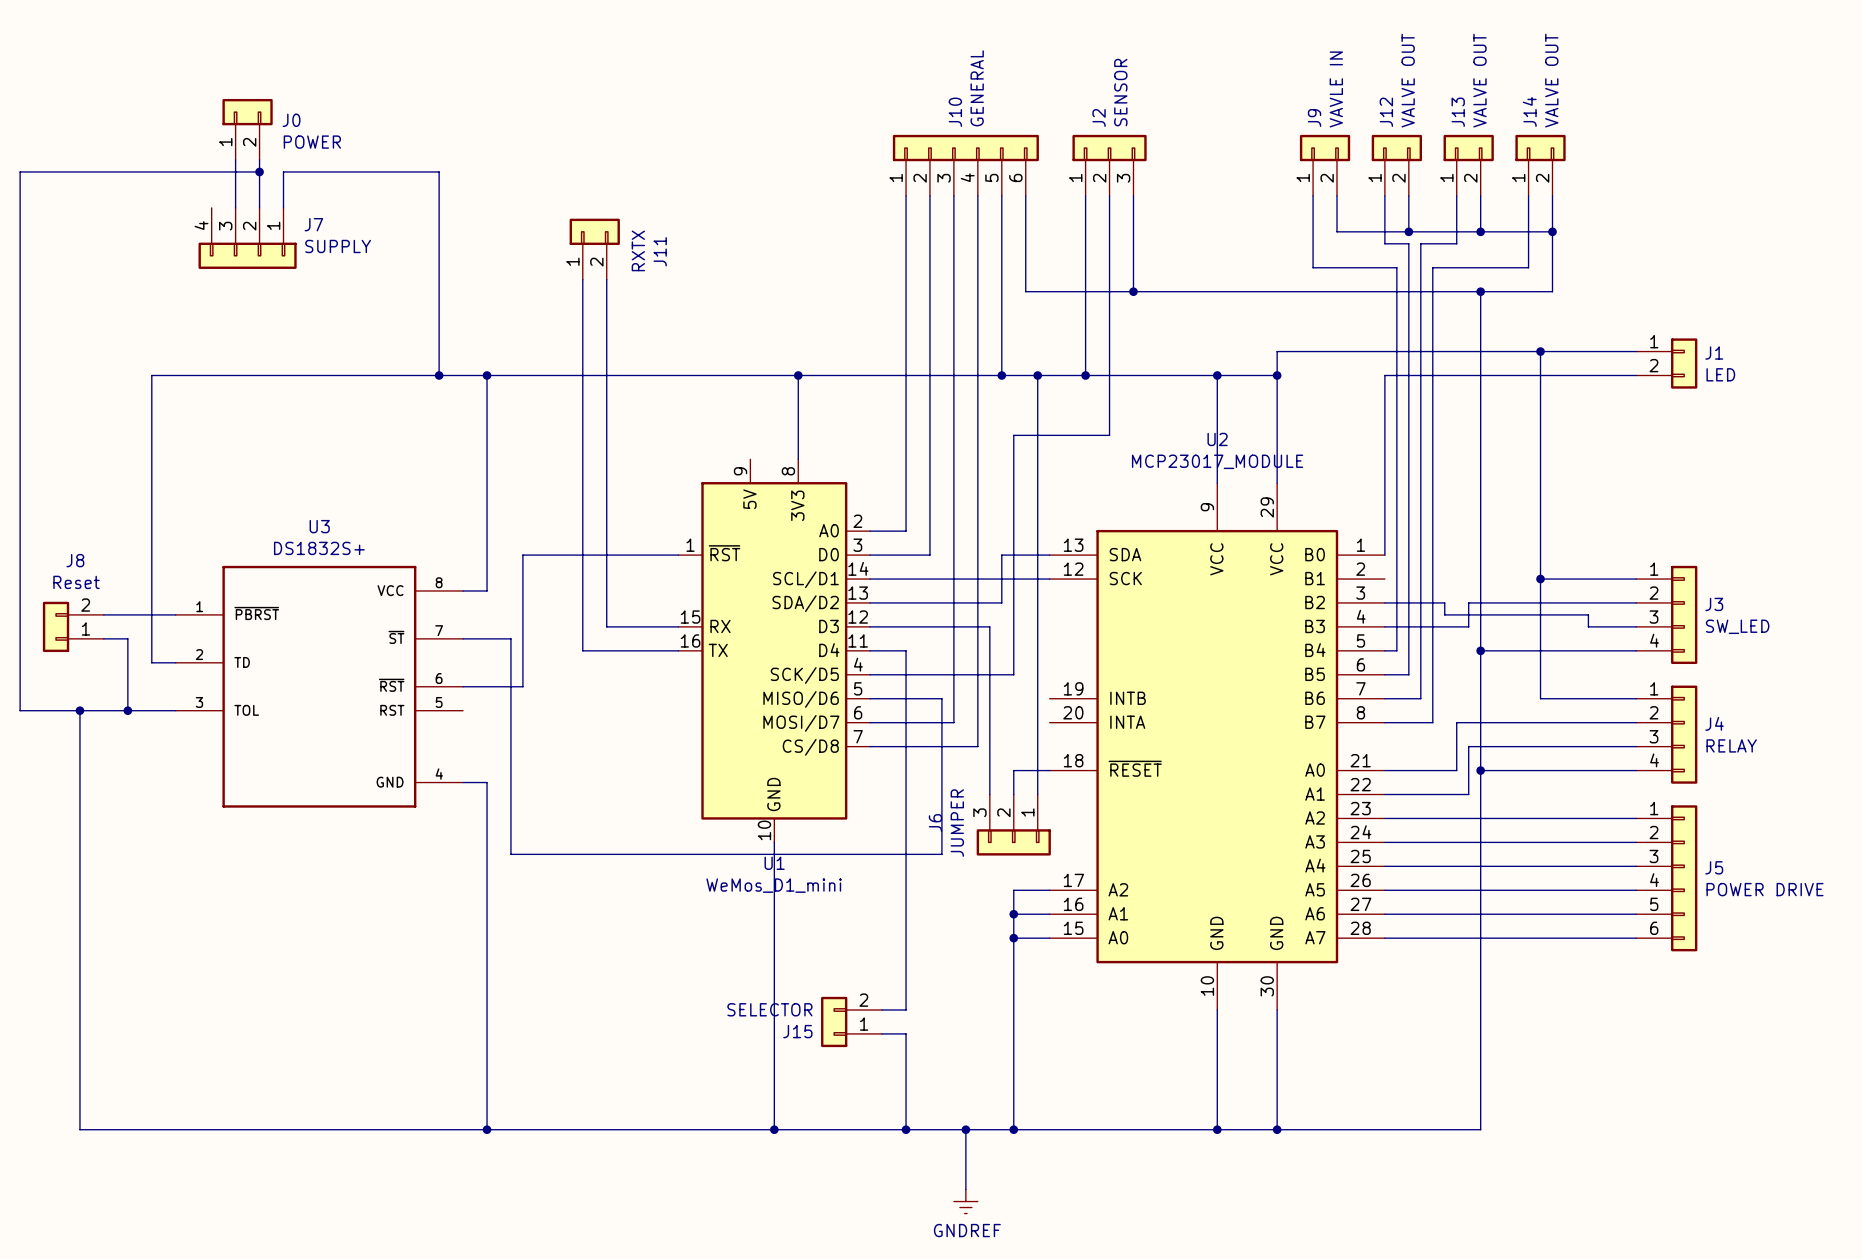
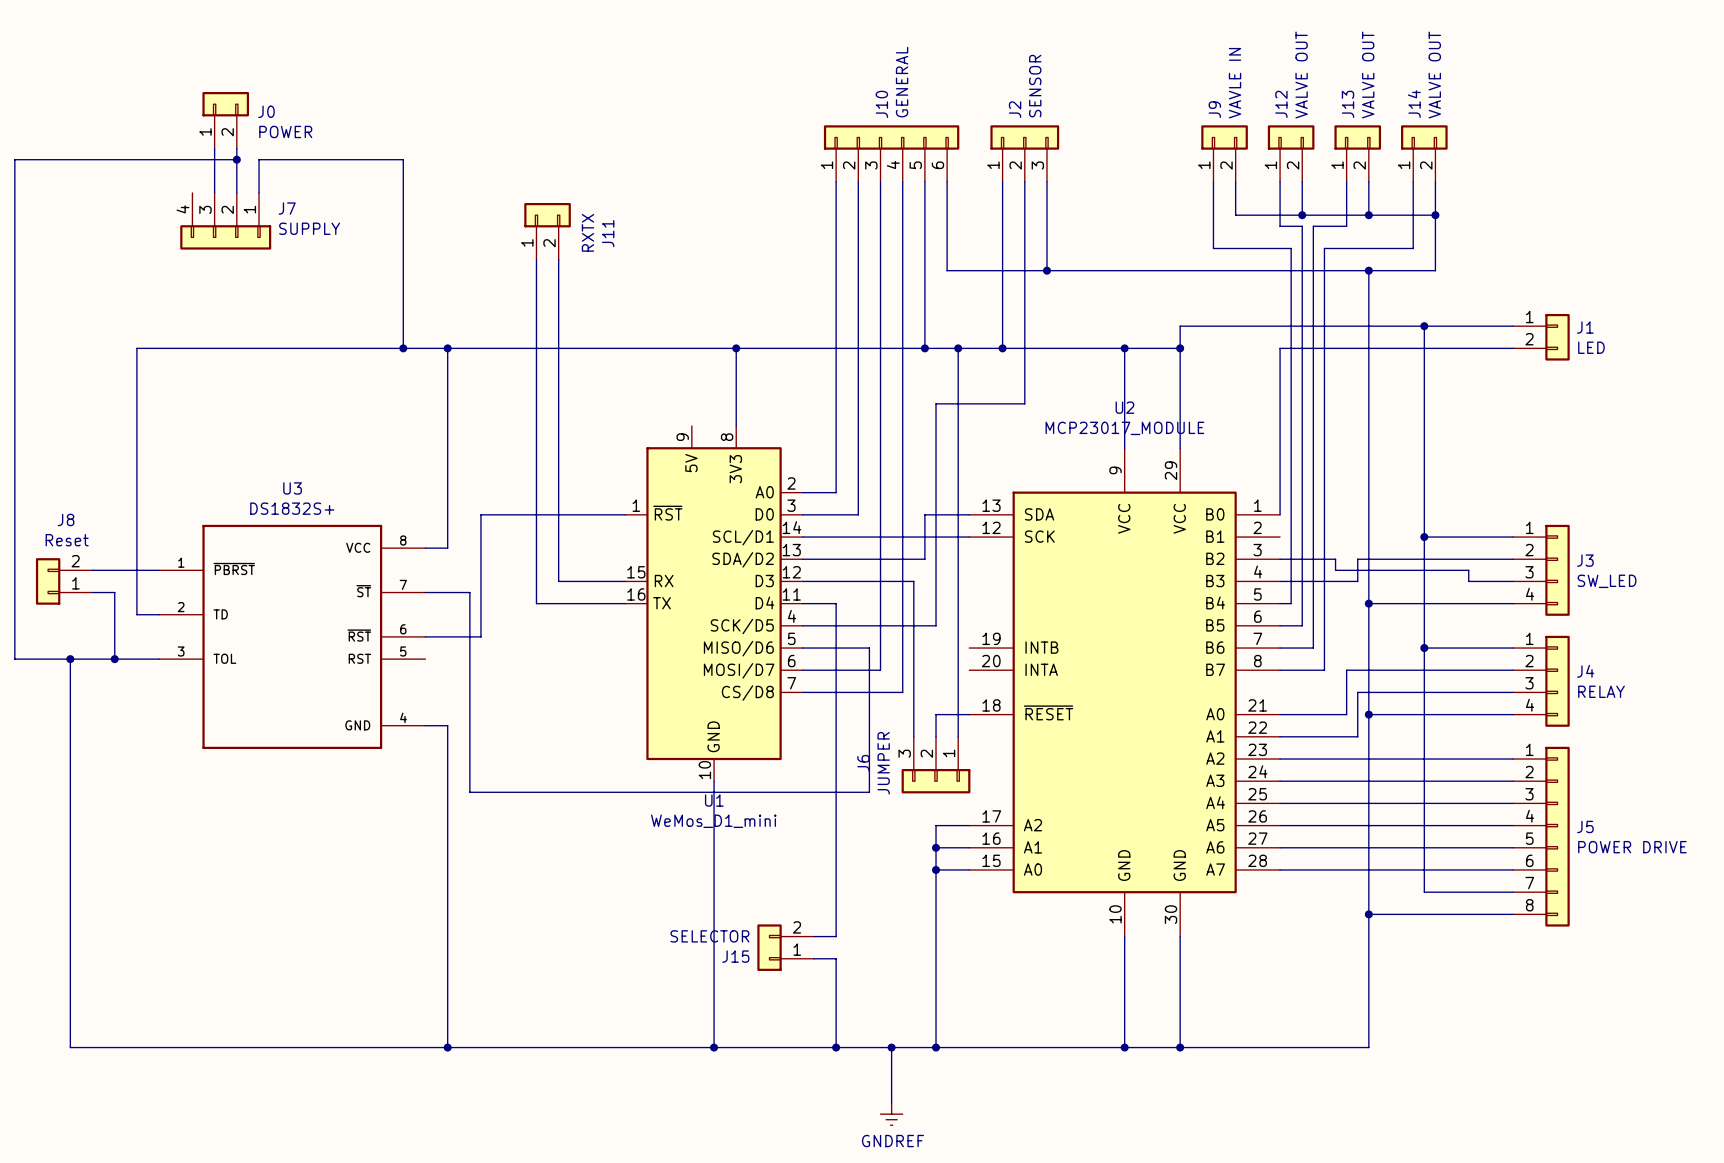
wire: none -> (1424, 648) (1424, 892) (1513, 892)
junction: none -> (1424, 648)
J5 symbol: [1636, 805, 1698, 952] -> [1513, 746, 1570, 927]
wire: none -> (1368, 914) (1513, 914)
junction: none -> (1368, 914)

